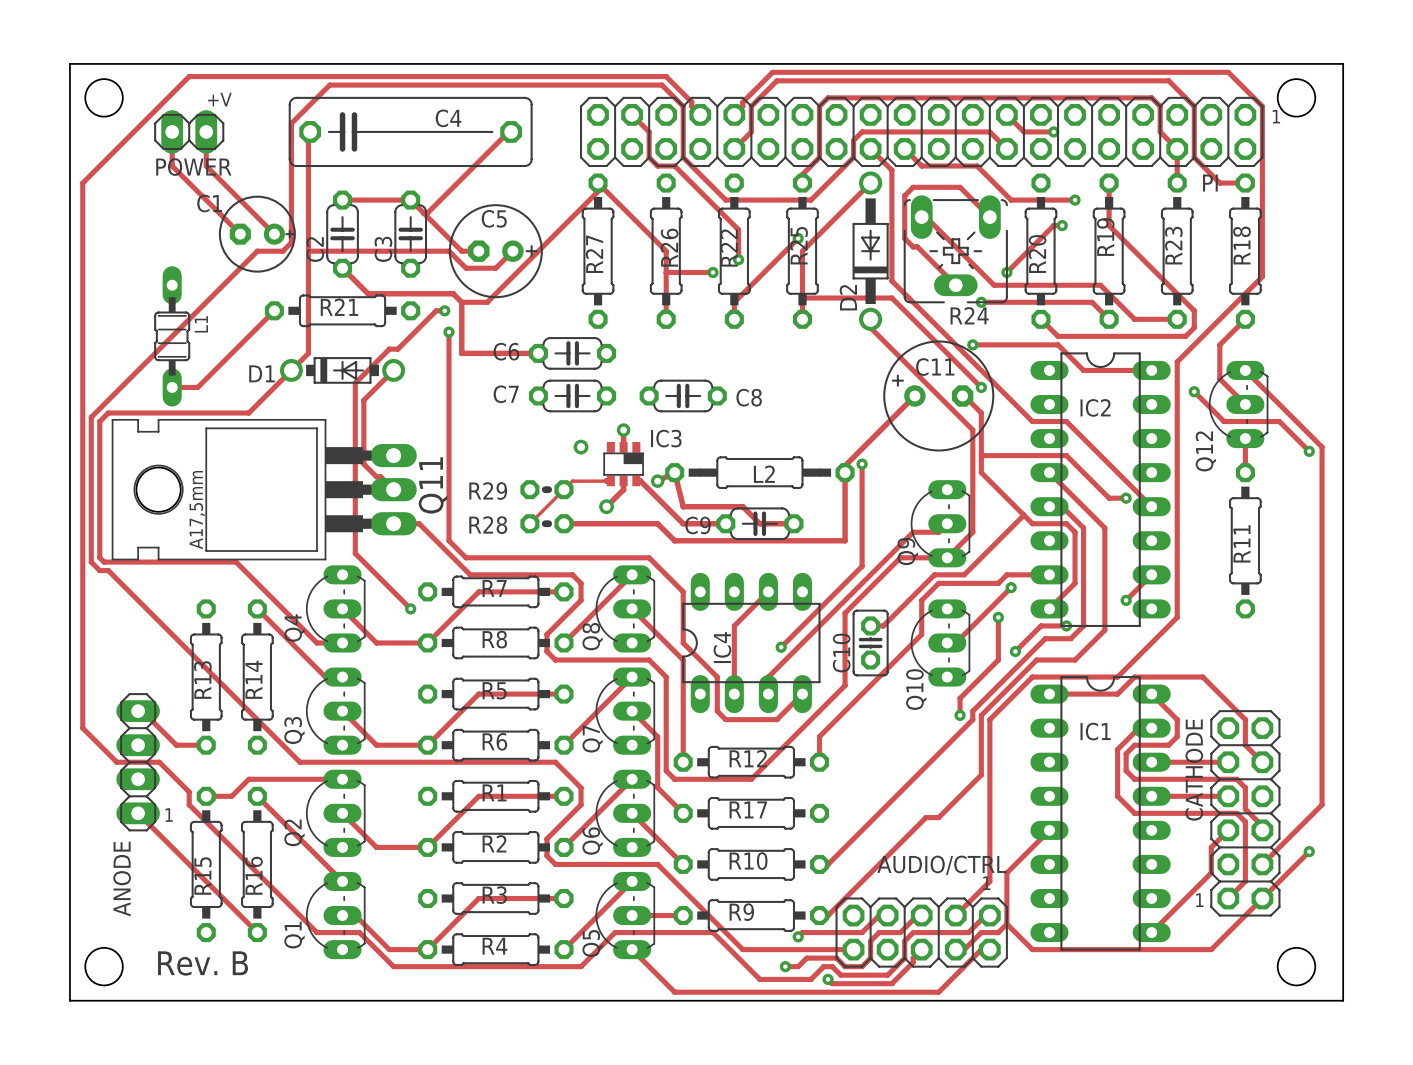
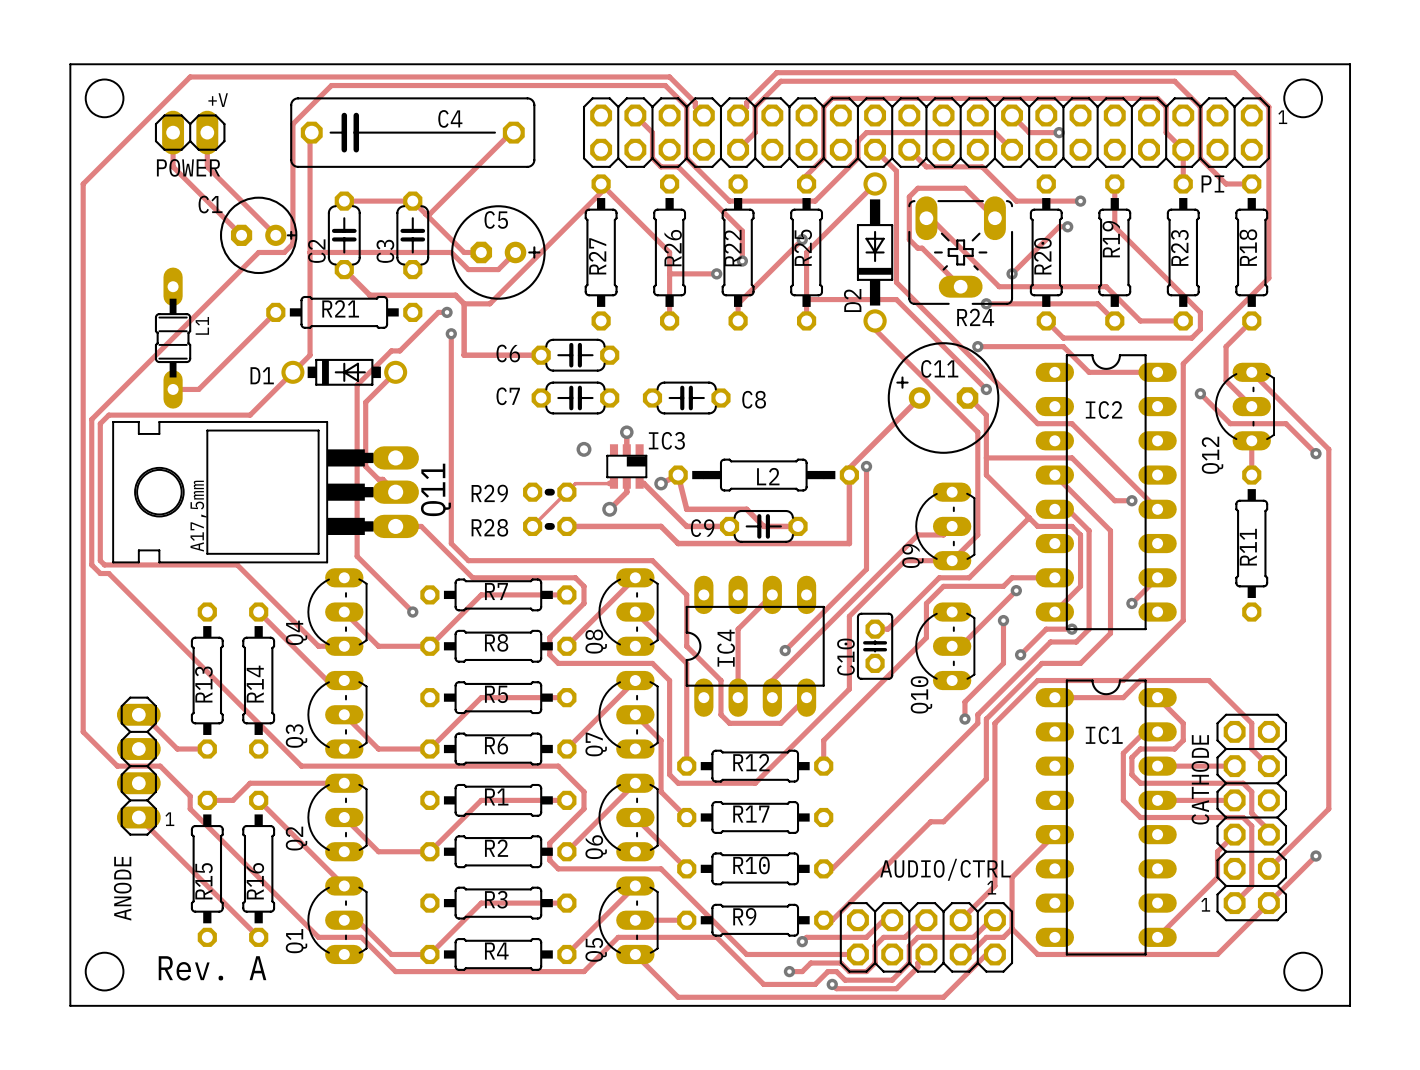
text: Rev. B (203, 963) -> Rev. A (212, 968)

